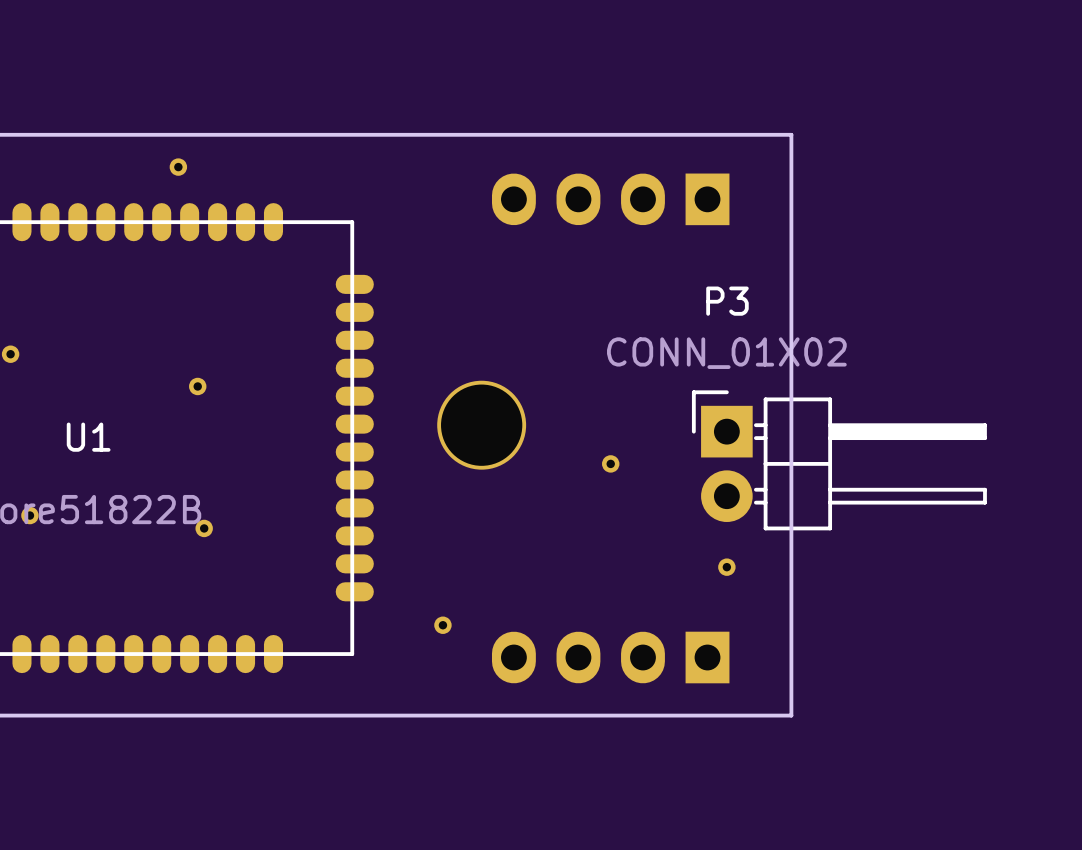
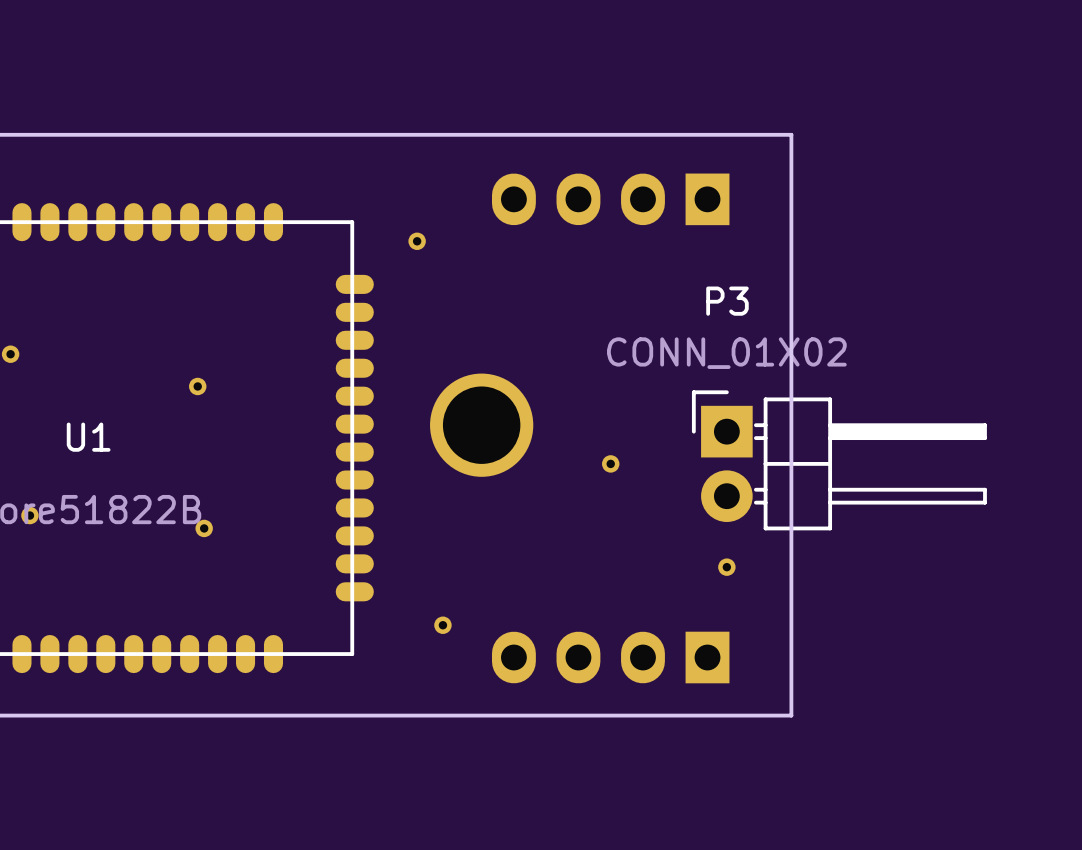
part position: (178, 167) -> (417, 241)
part footprint: [437, 380, 527, 470] -> [430, 373, 534, 477]

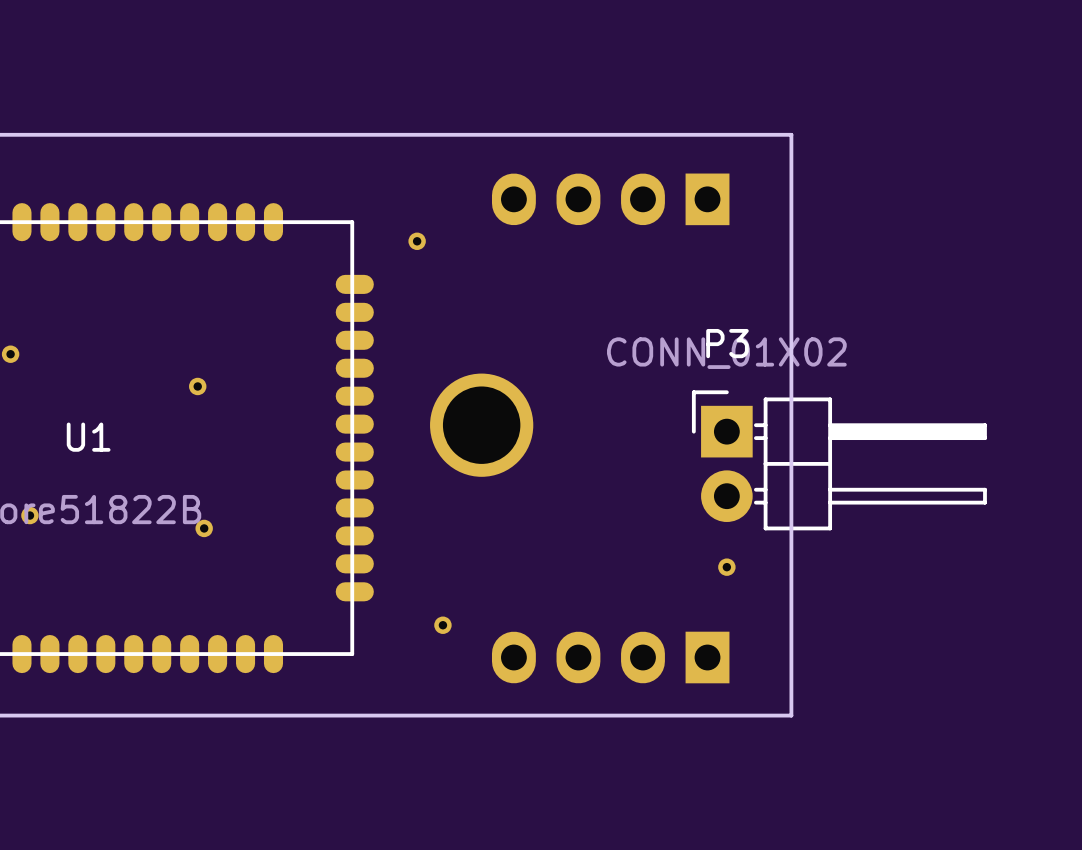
P3 name position: P3 (727, 301) -> P3 (727, 343)
part: (610, 463) -> none

